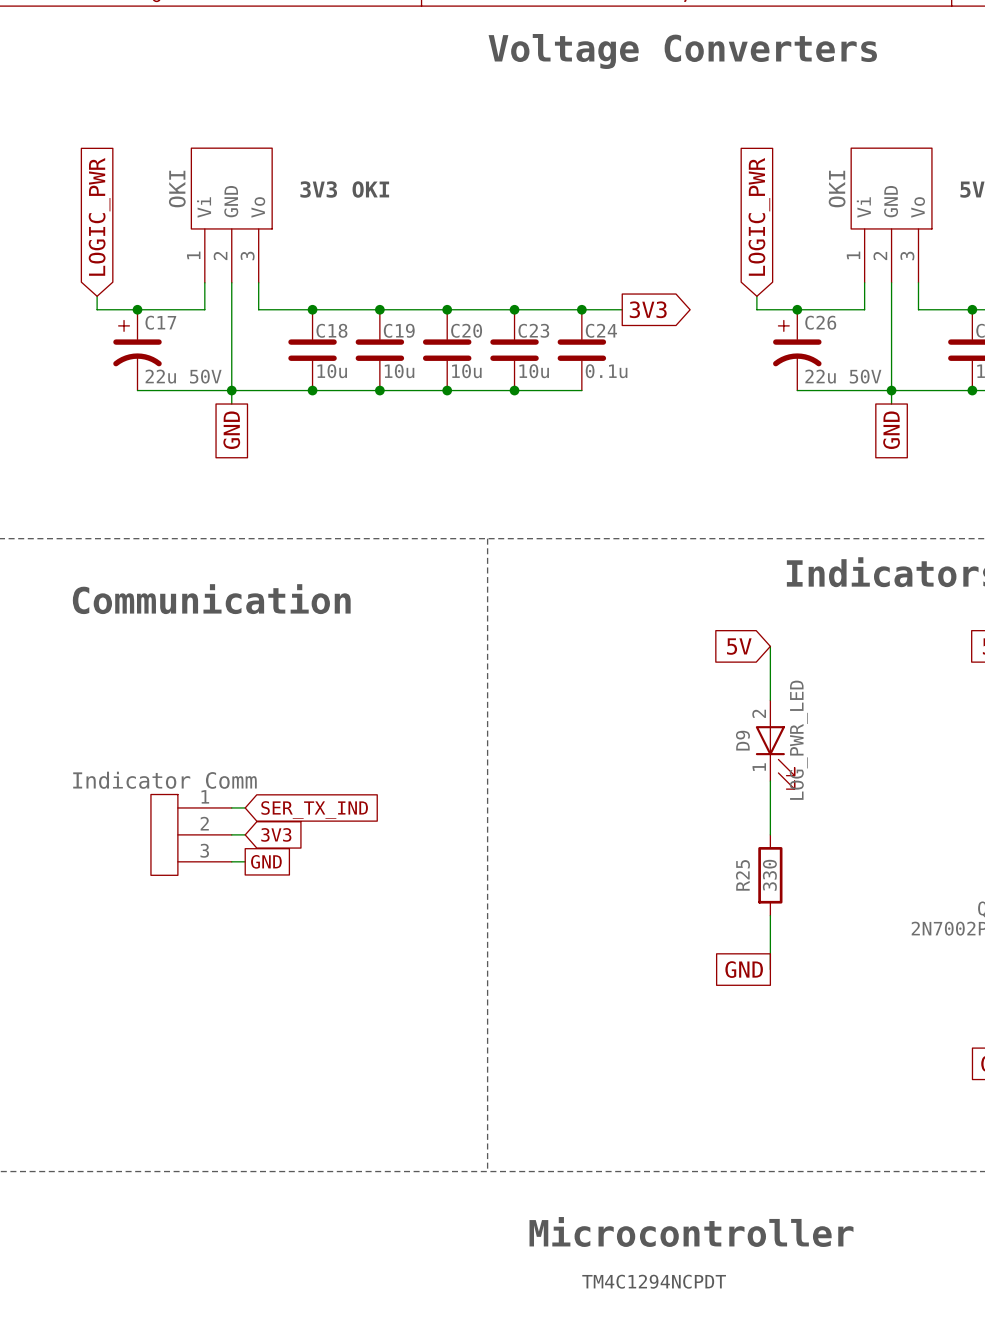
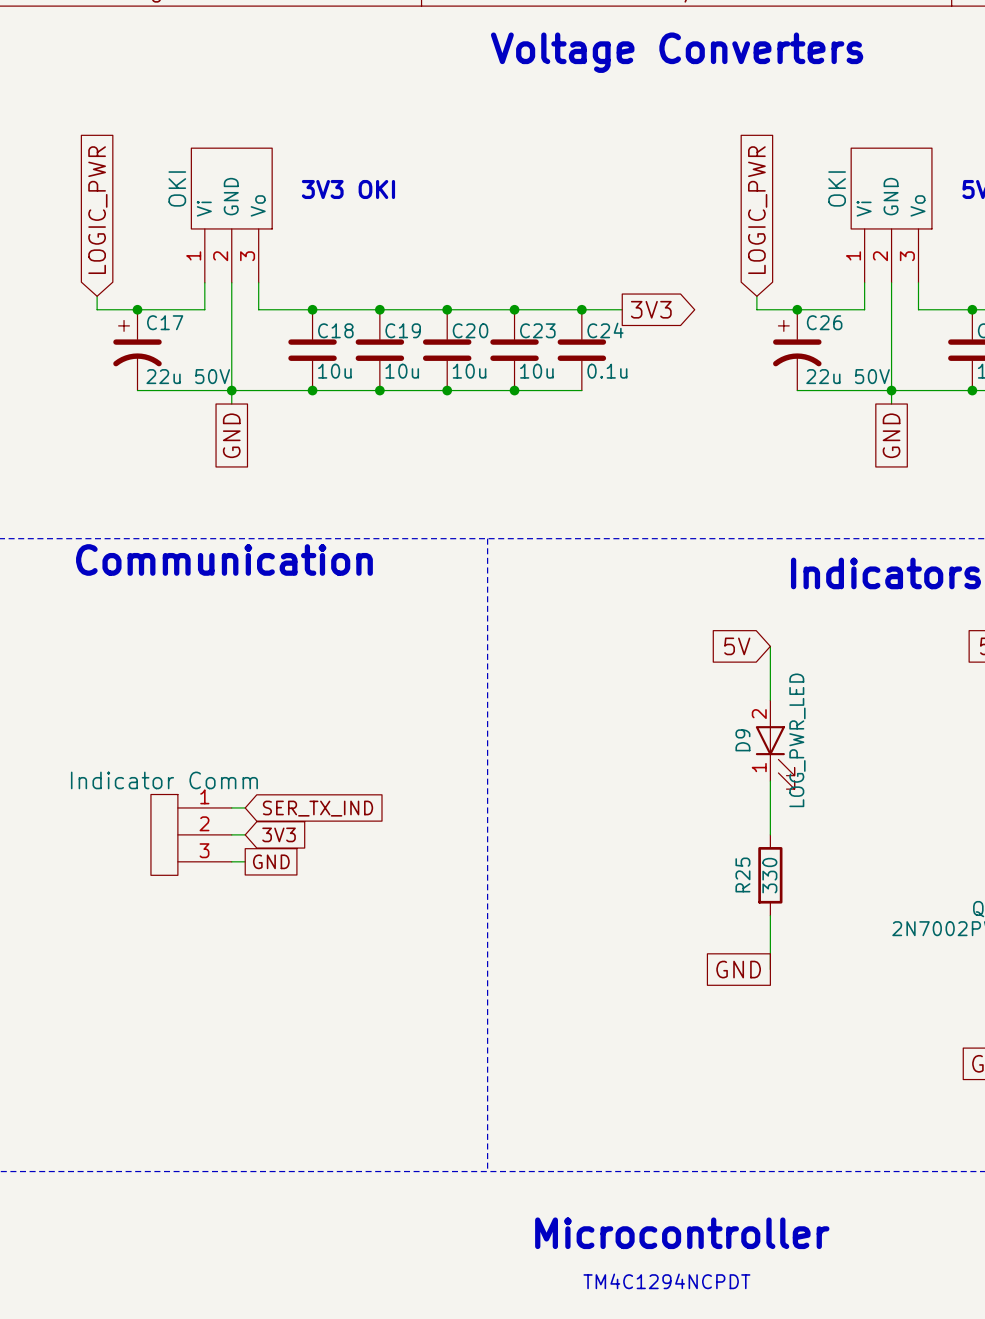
text position: Communication (211, 599) -> Communication (224, 559)

